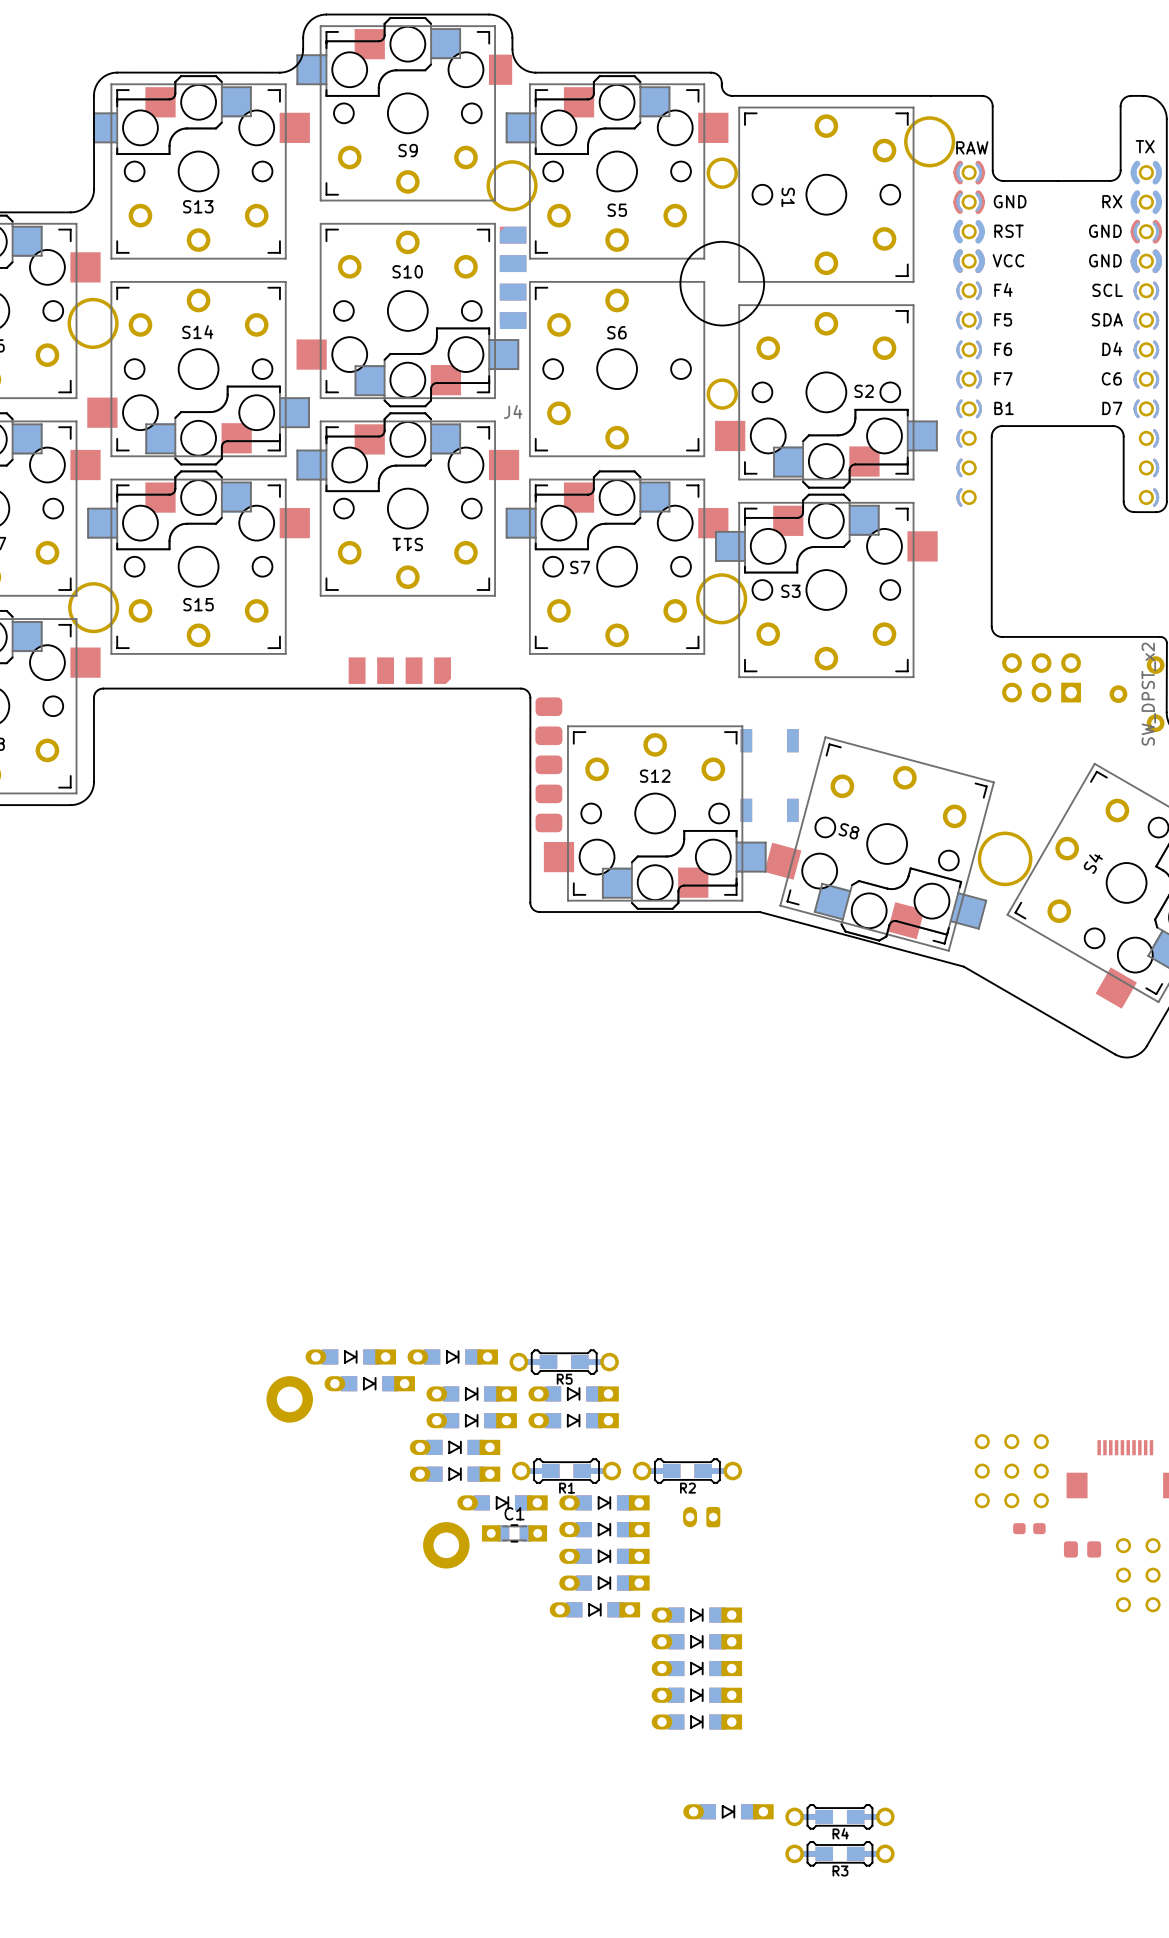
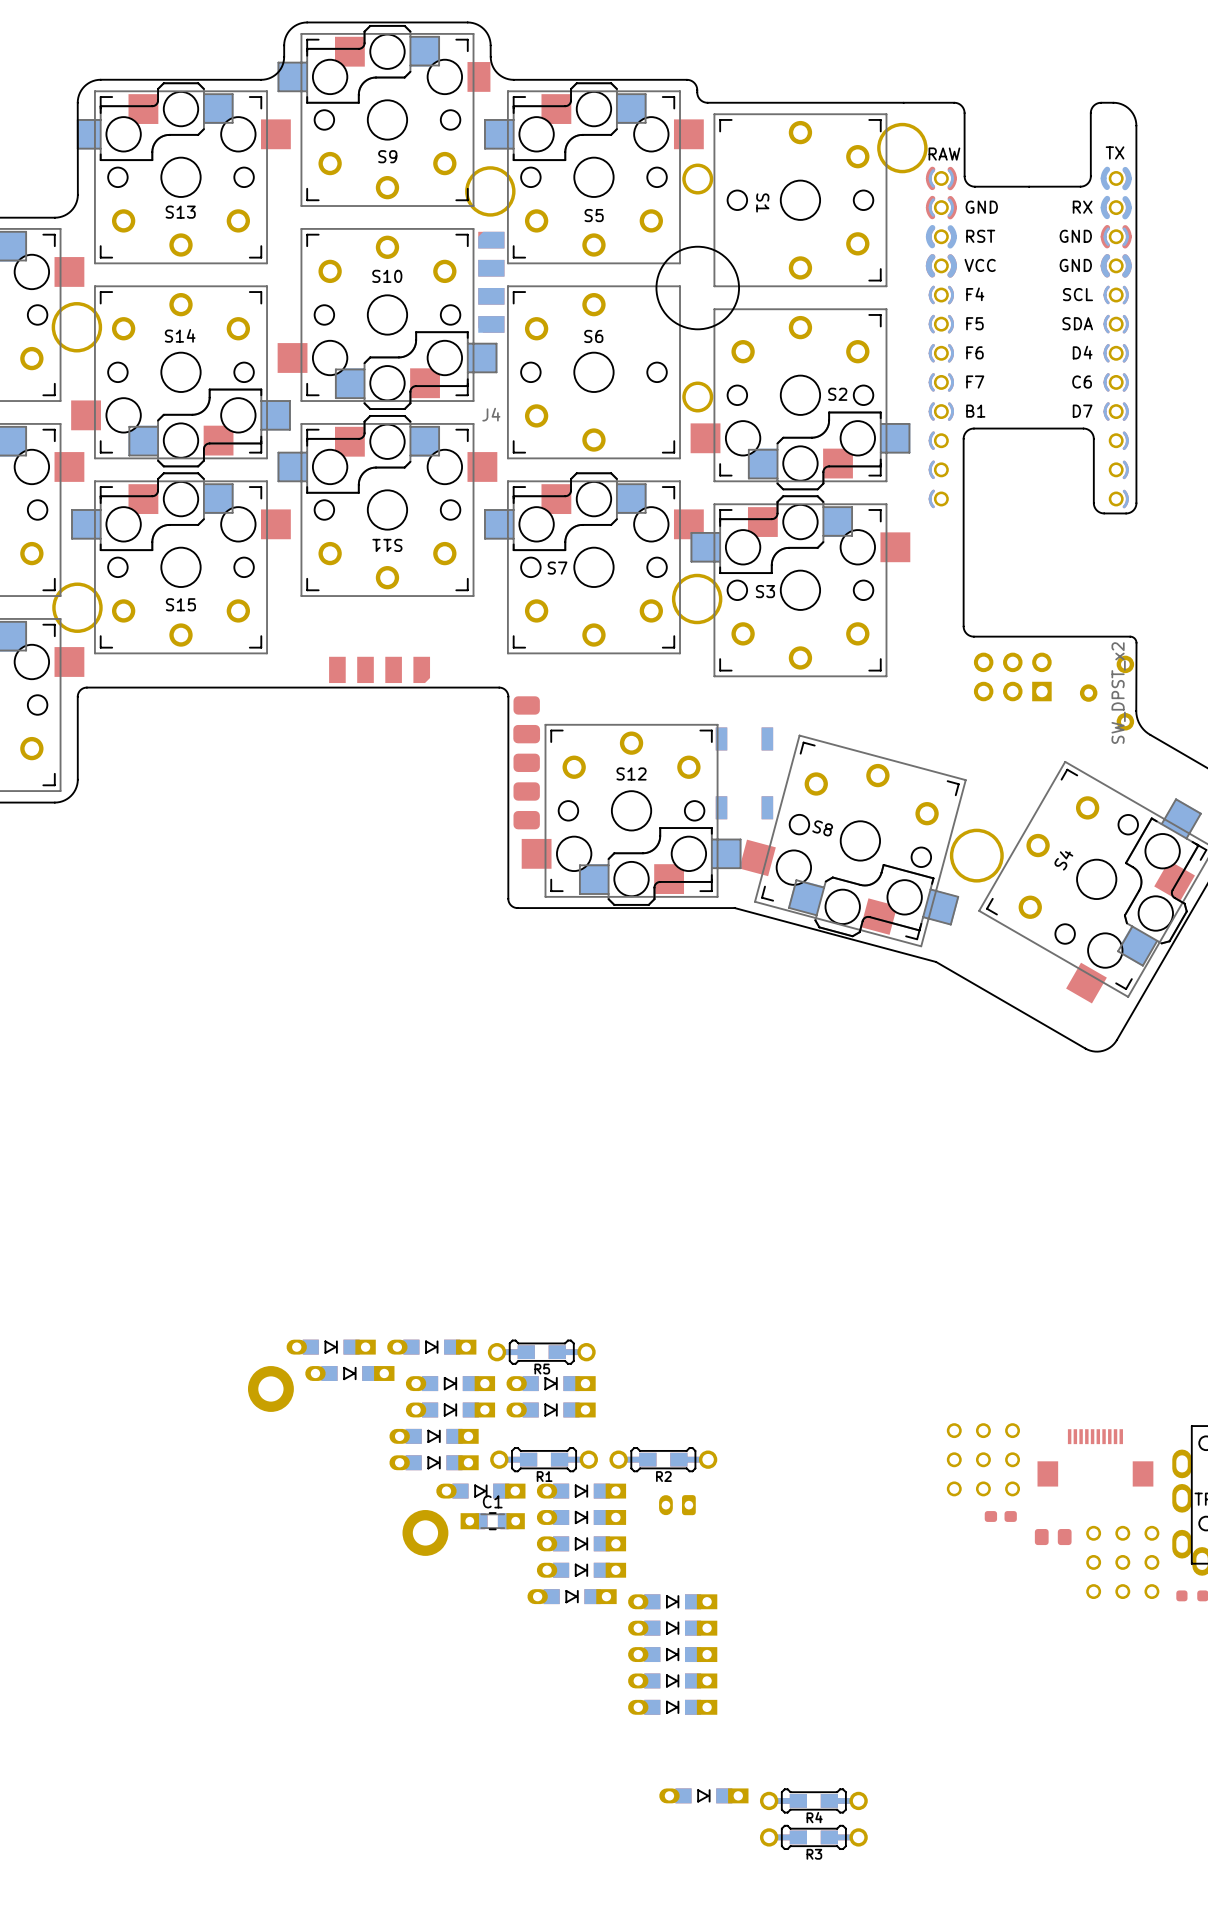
S9 footprint: [296, 17, 513, 202] -> [277, 25, 491, 207]

